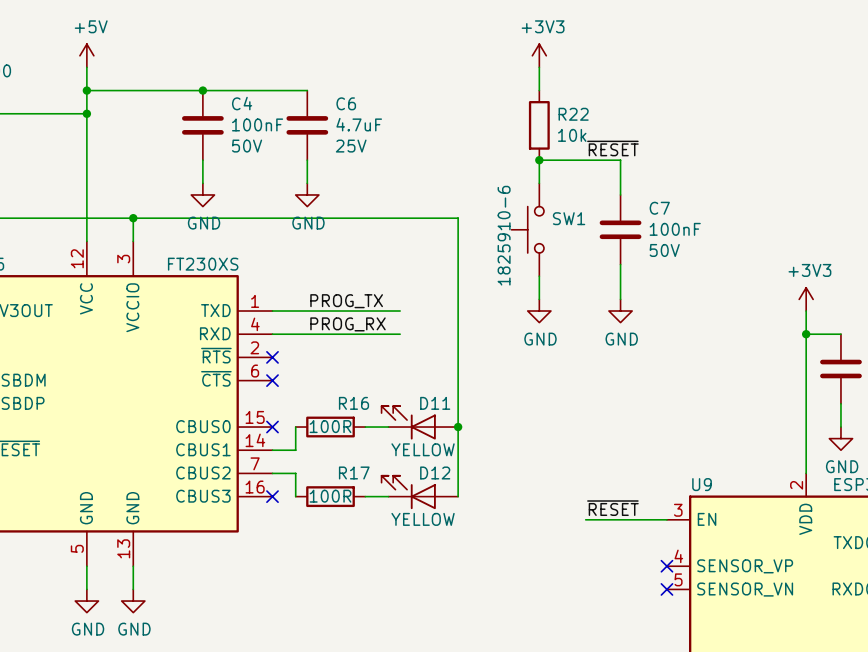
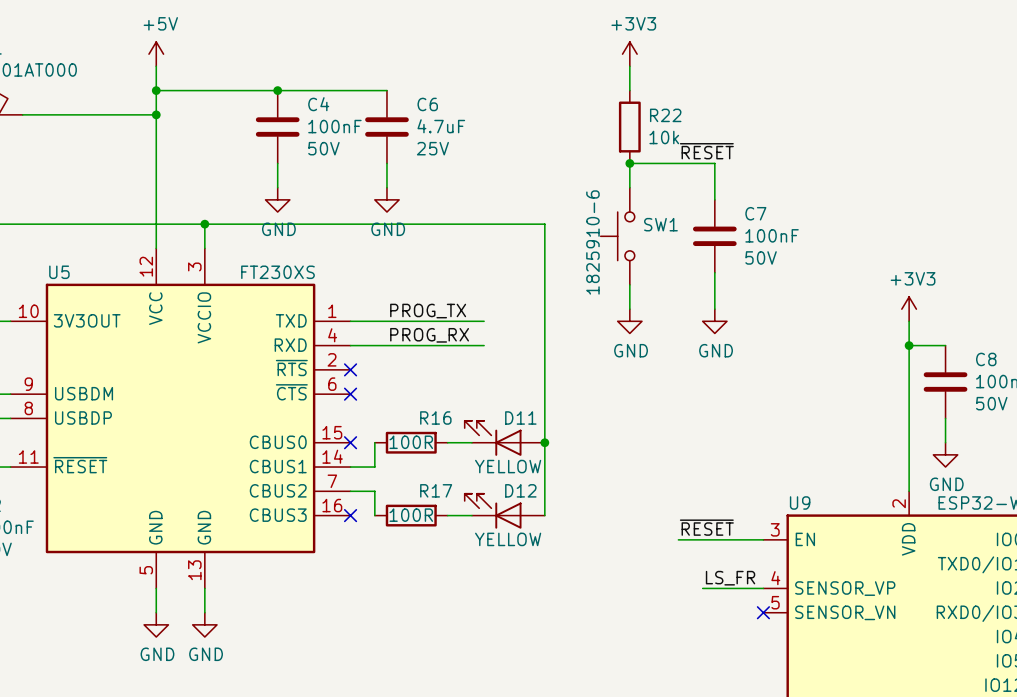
label: none -> LS_FR (730, 578)
wire: none -> (702, 588) (763, 588)
no-connect mark: (666, 566) -> none

